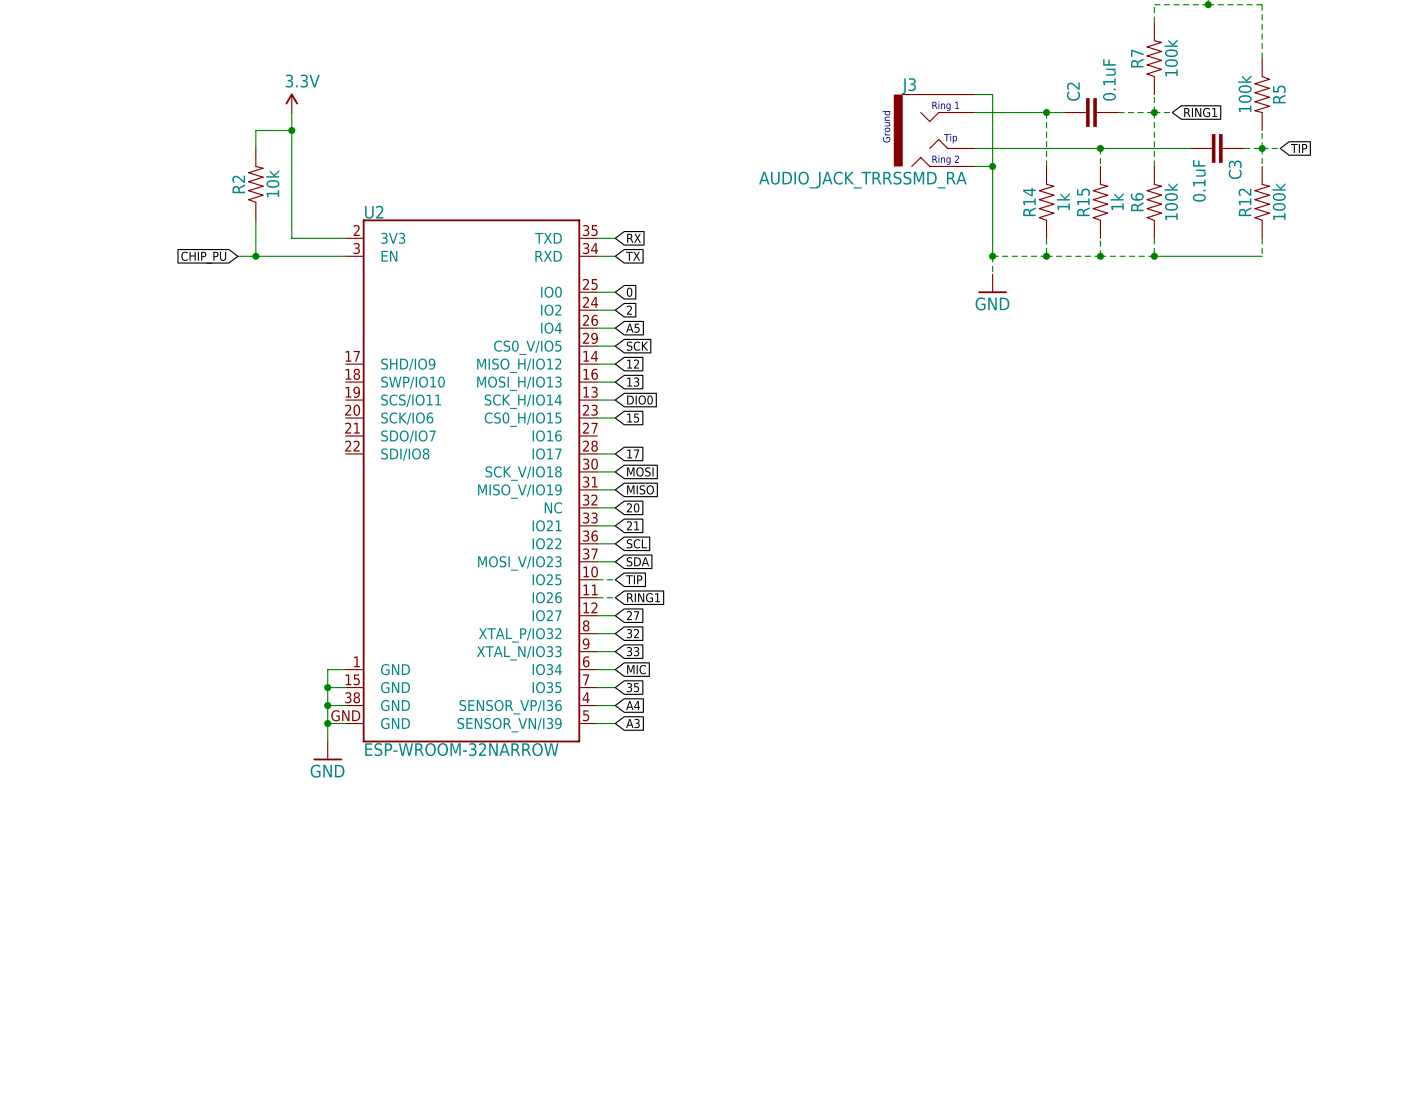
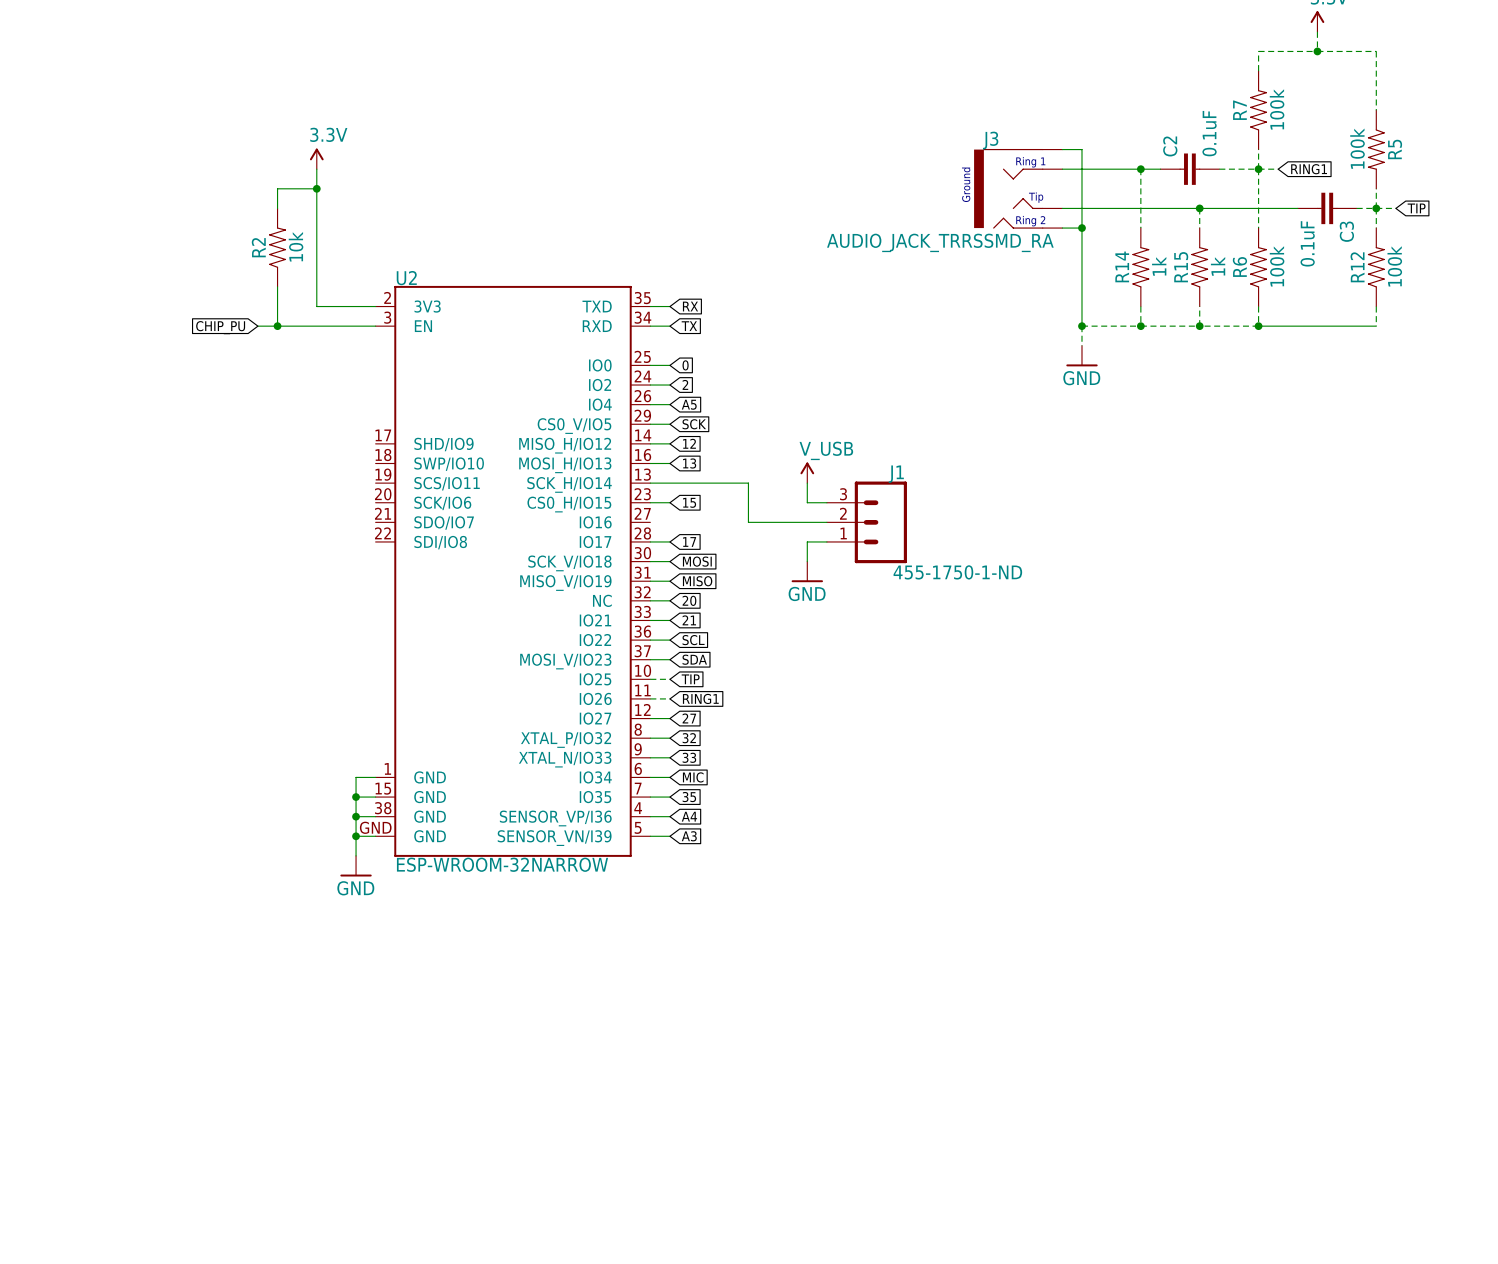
power symbol: none -> V_USB (807, 472)
wire: none -> (669, 483) (748, 483) (748, 522) (826, 522)
global label: DIO0 (640, 400) -> none
wire: none -> (807, 483) (807, 502) (826, 502)
J1: none -> 455-1750-1-ND (866, 522)
wire: none -> (826, 541) (807, 541) (807, 561)
power symbol: none -> GND (807, 571)

